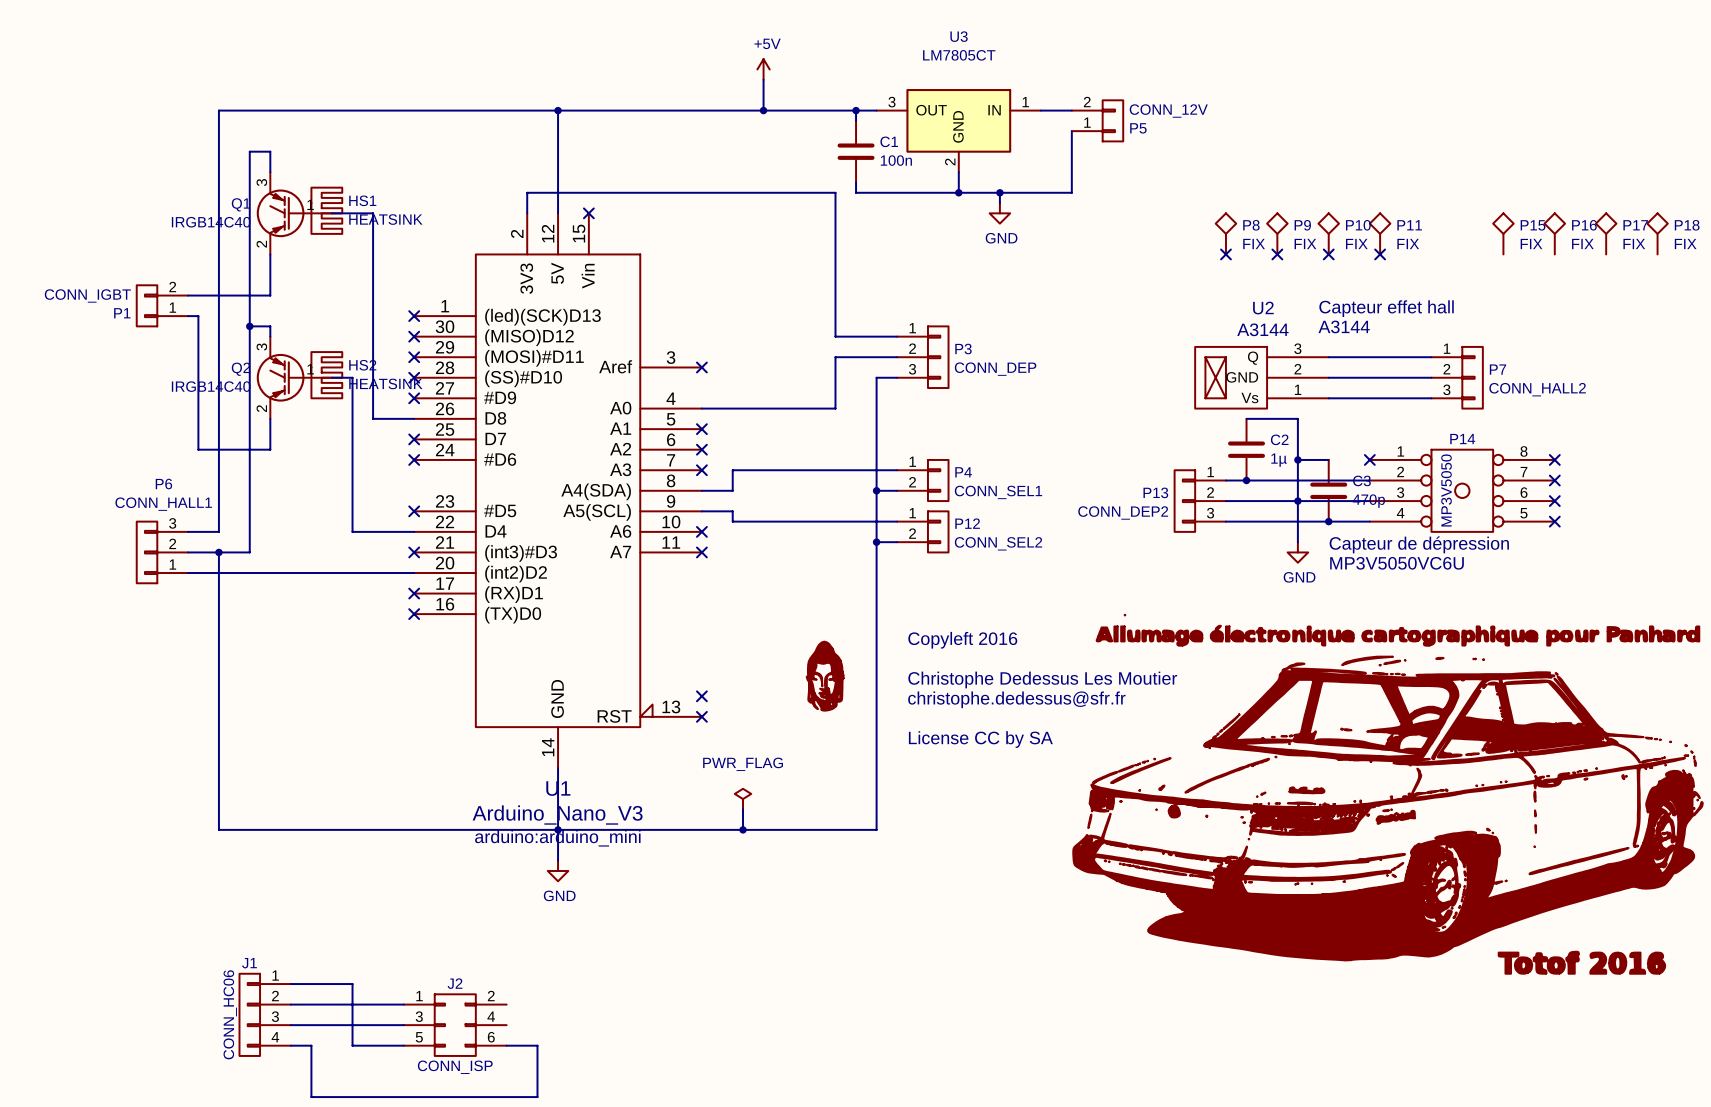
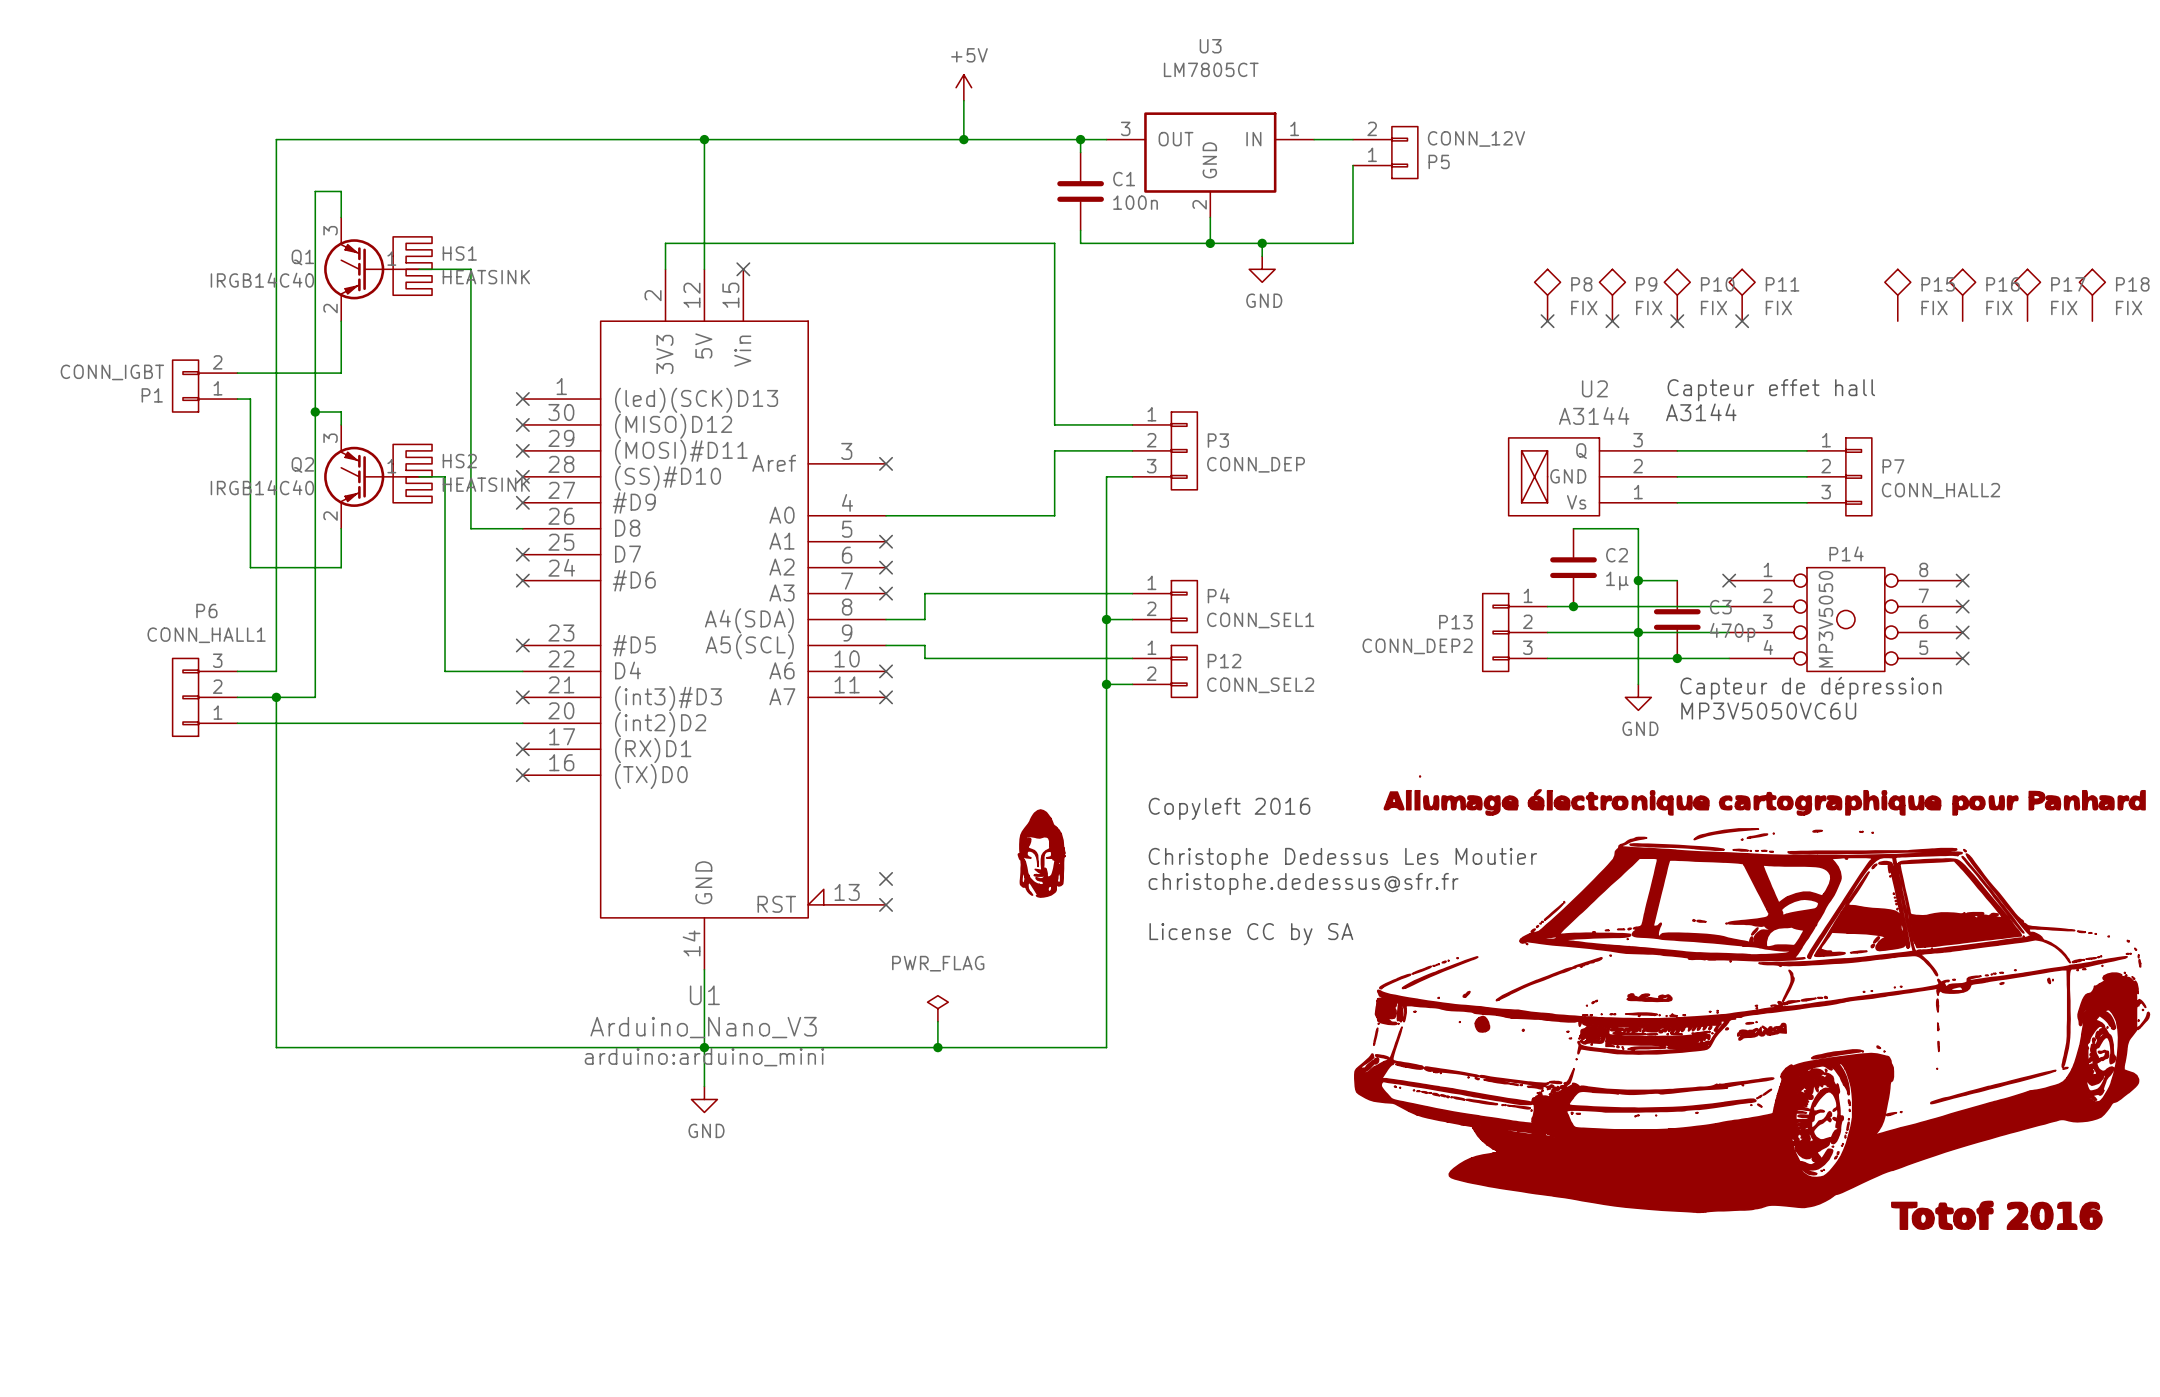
wire: (290, 984) (352, 984) (352, 1045) (403, 1045) -> none
wire: (290, 1004) (403, 1004) -> none
J1: CONN_HC06 (265, 1014) -> none
wire: (290, 1025) (403, 1025) -> none
J2: CONN_ISP (455, 1025) -> none
wire: (290, 1045) (311, 1045) (311, 1097) (537, 1097) (537, 1045) (506, 1045) -> none

